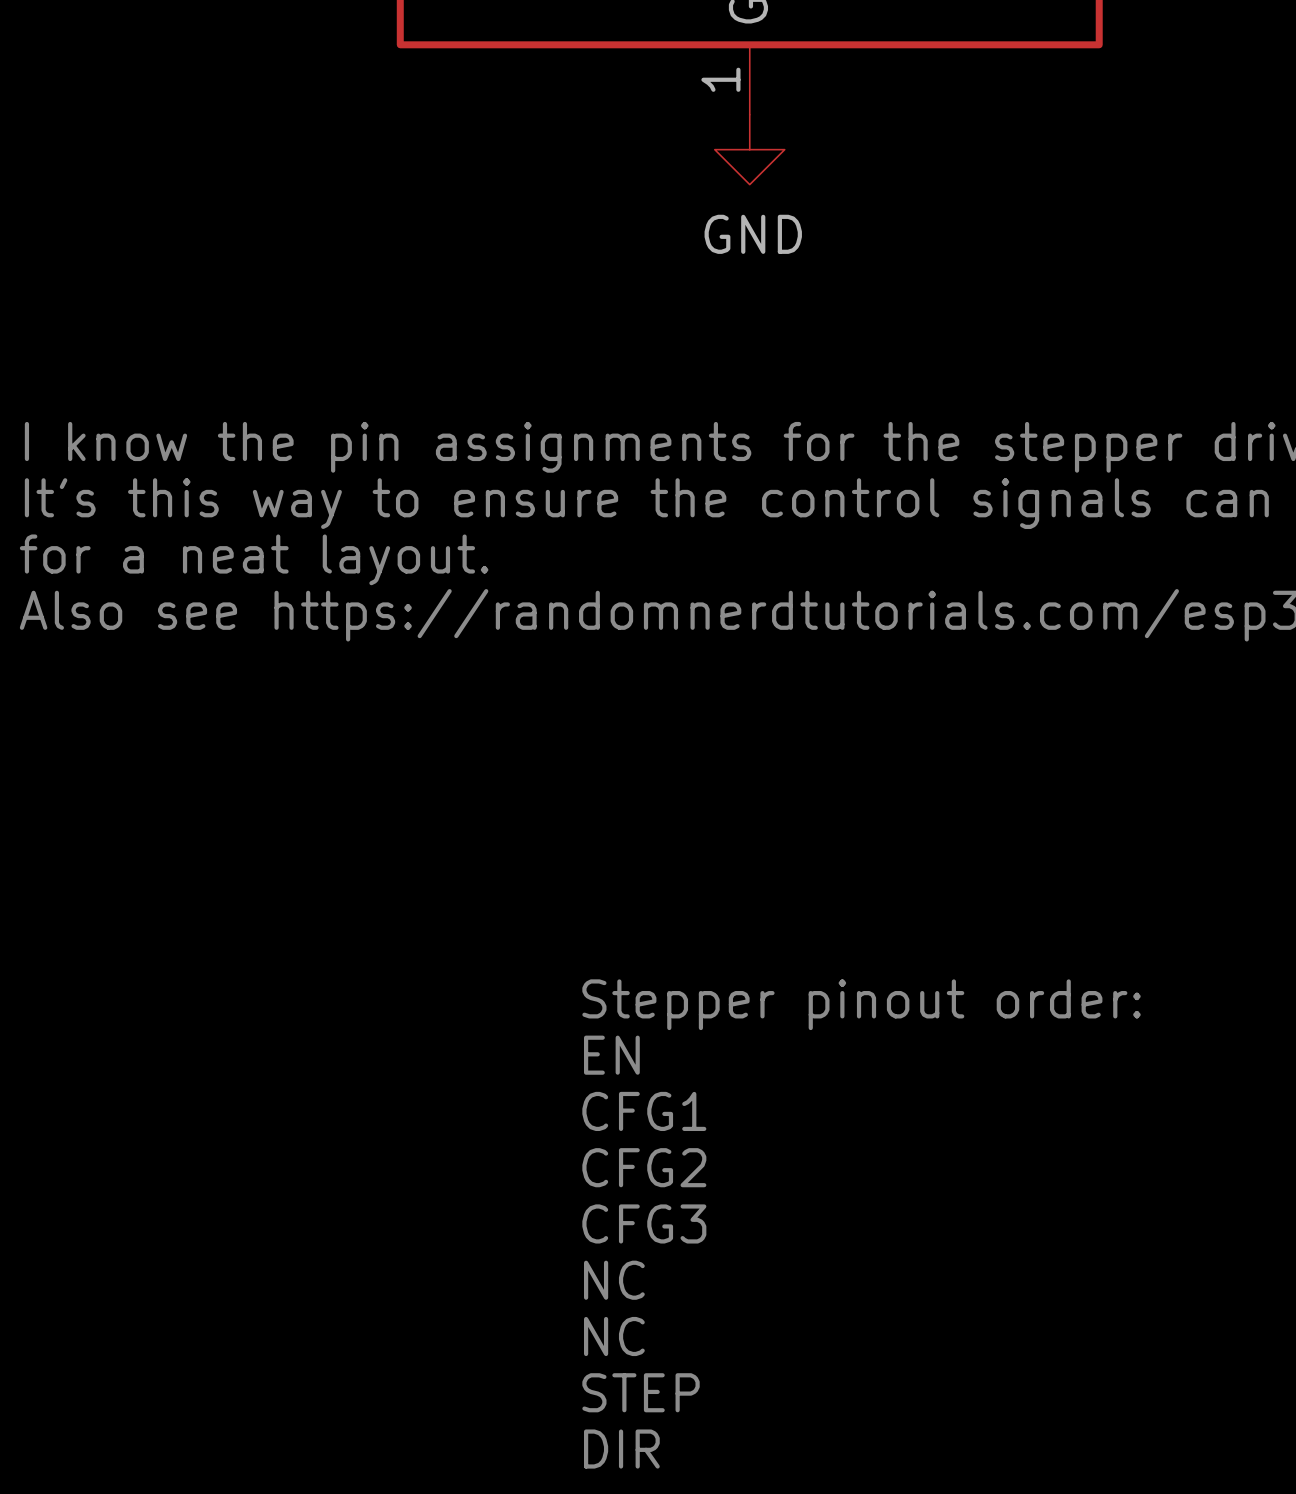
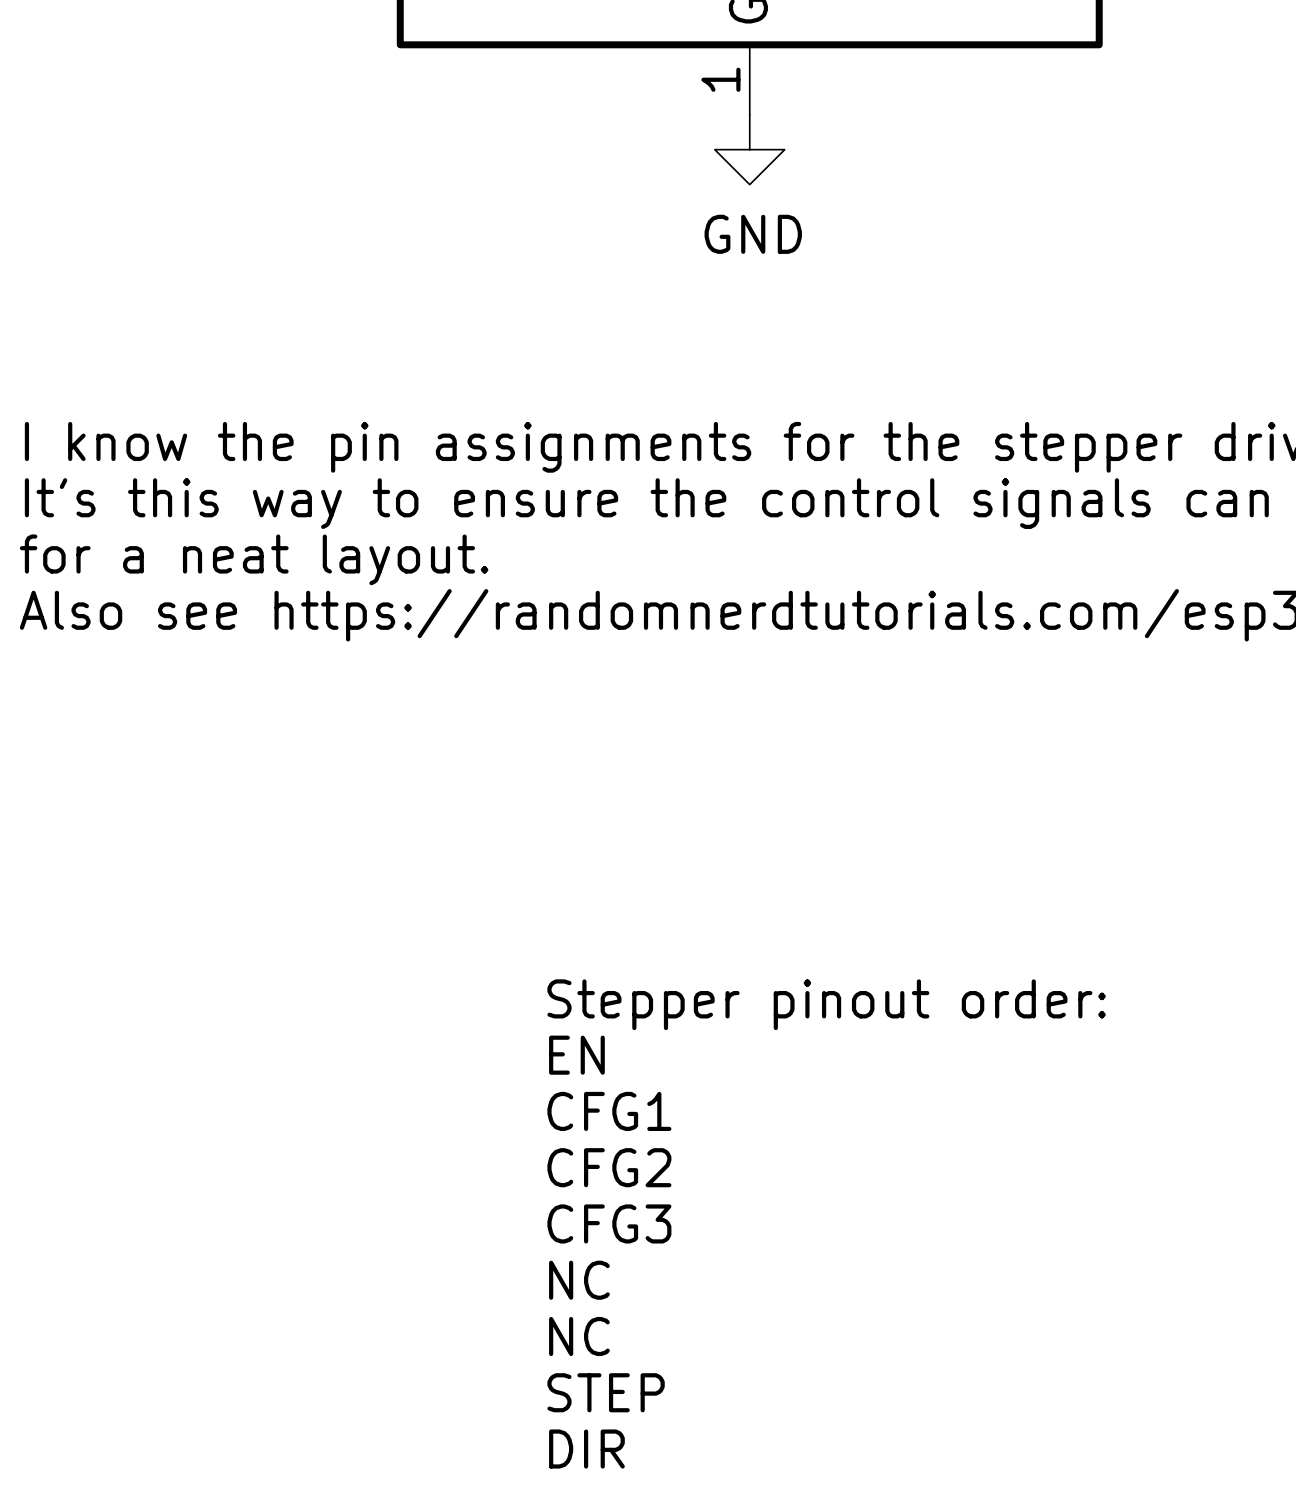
text position: Stepper pinout order: (861, 1004) -> Stepper pinout order: (826, 1004)
text position: EN (611, 1055) -> EN (576, 1055)
text position: CFG1 (644, 1111) -> CFG1 (609, 1111)
text position: CFG2 (644, 1167) -> CFG2 (609, 1167)
text position: CFG3 (644, 1223) -> CFG3 (609, 1223)
text: none -> NC (579, 1280)
text: NC (614, 1280) -> none
text: none -> NC (579, 1336)
text: NC (614, 1336) -> none
text position: STEP (641, 1392) -> STEP (606, 1392)
text position: DIR (621, 1449) -> DIR (586, 1449)

